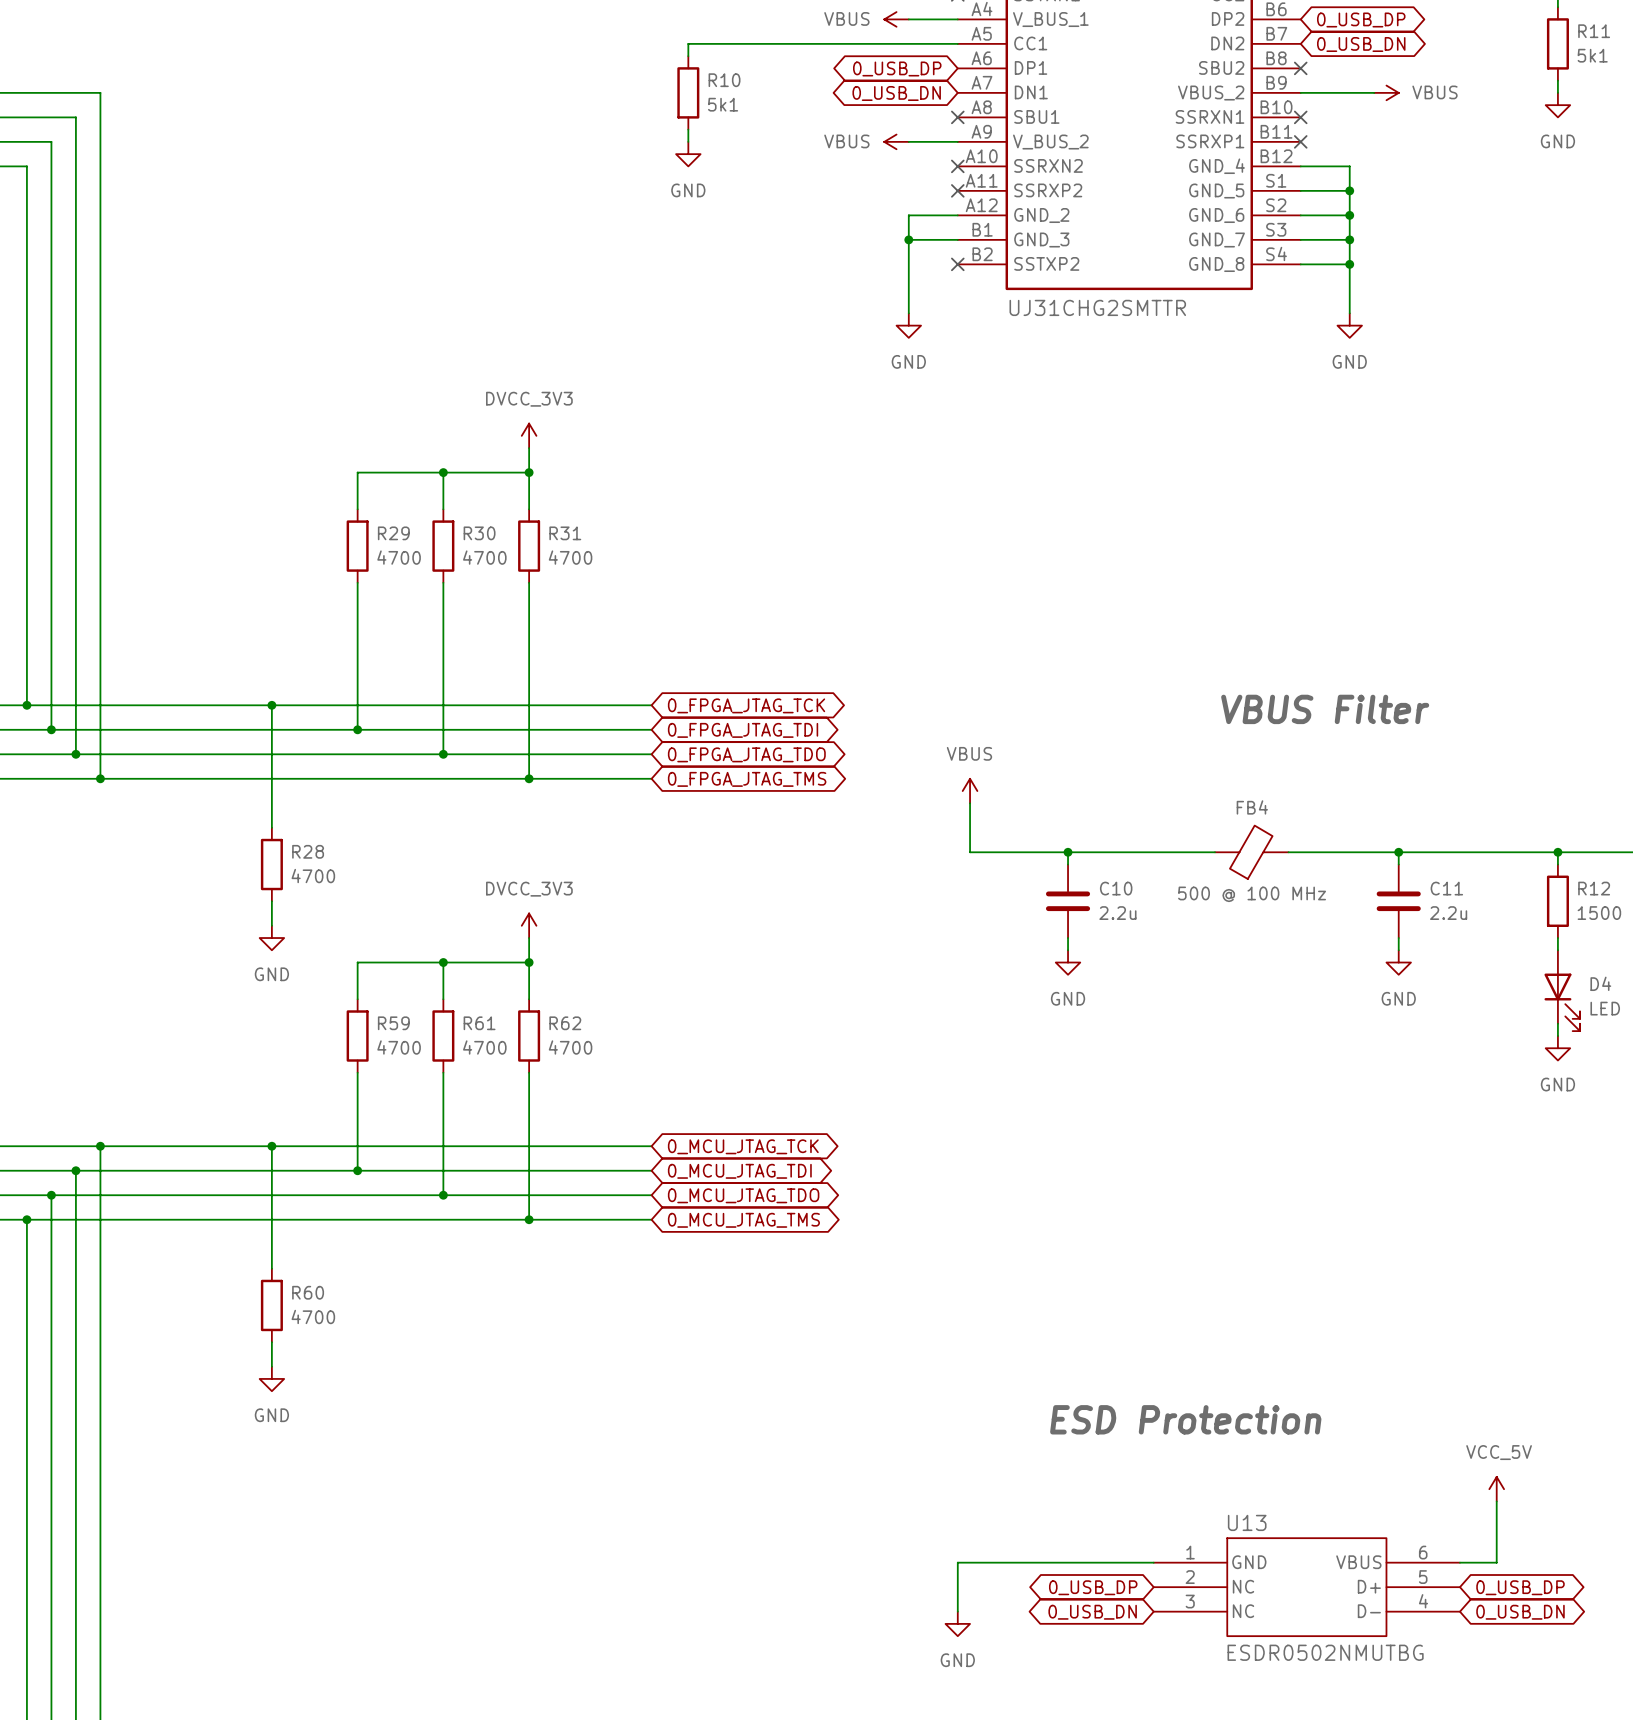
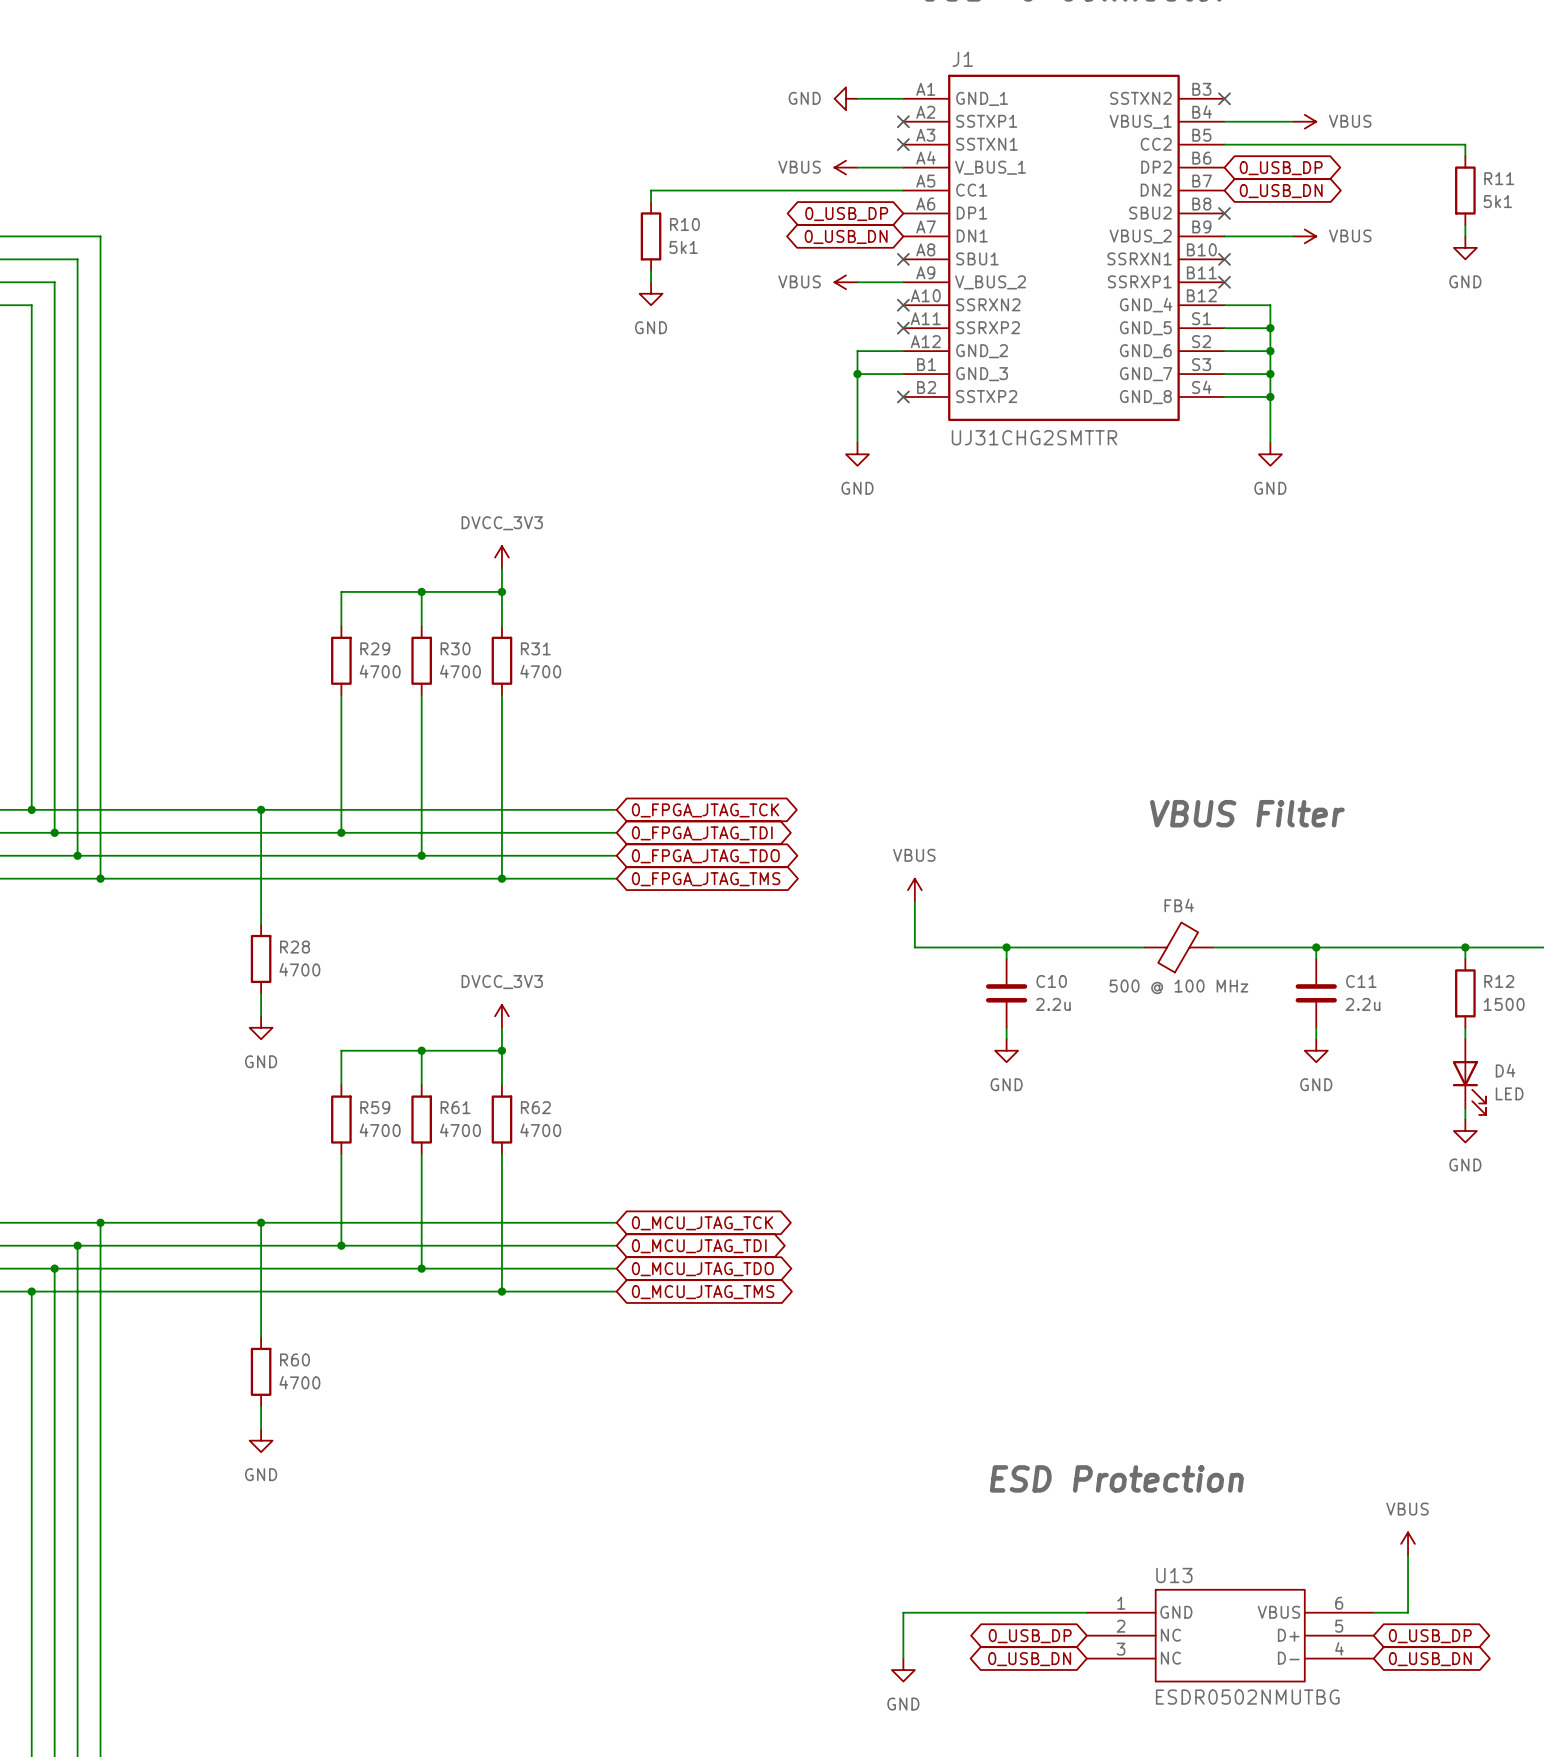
power symbol: VCC_5V (1496, 1489) -> VBUS (1408, 1543)

